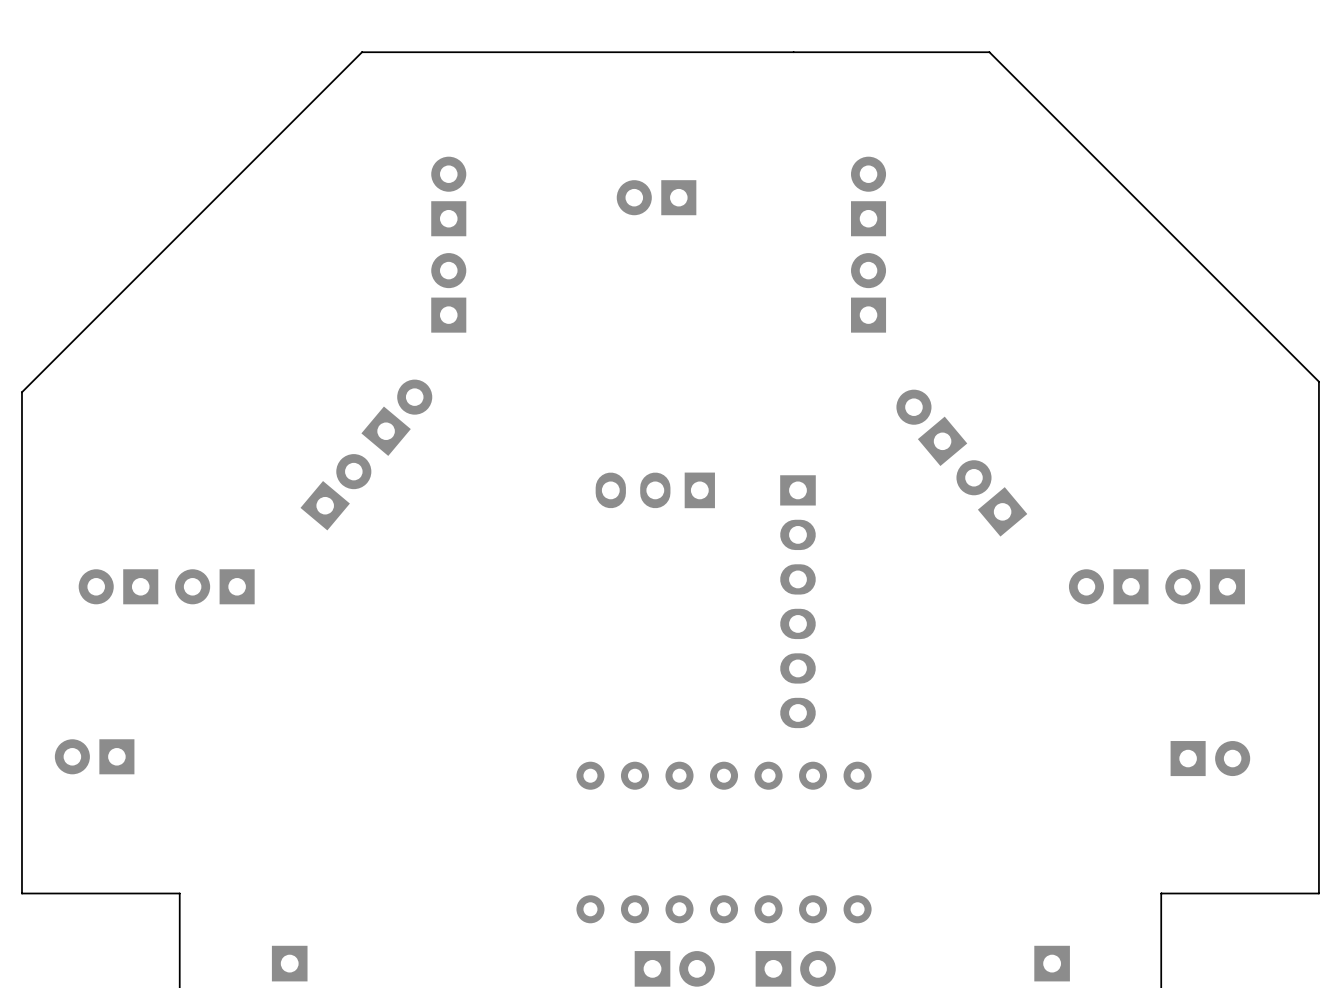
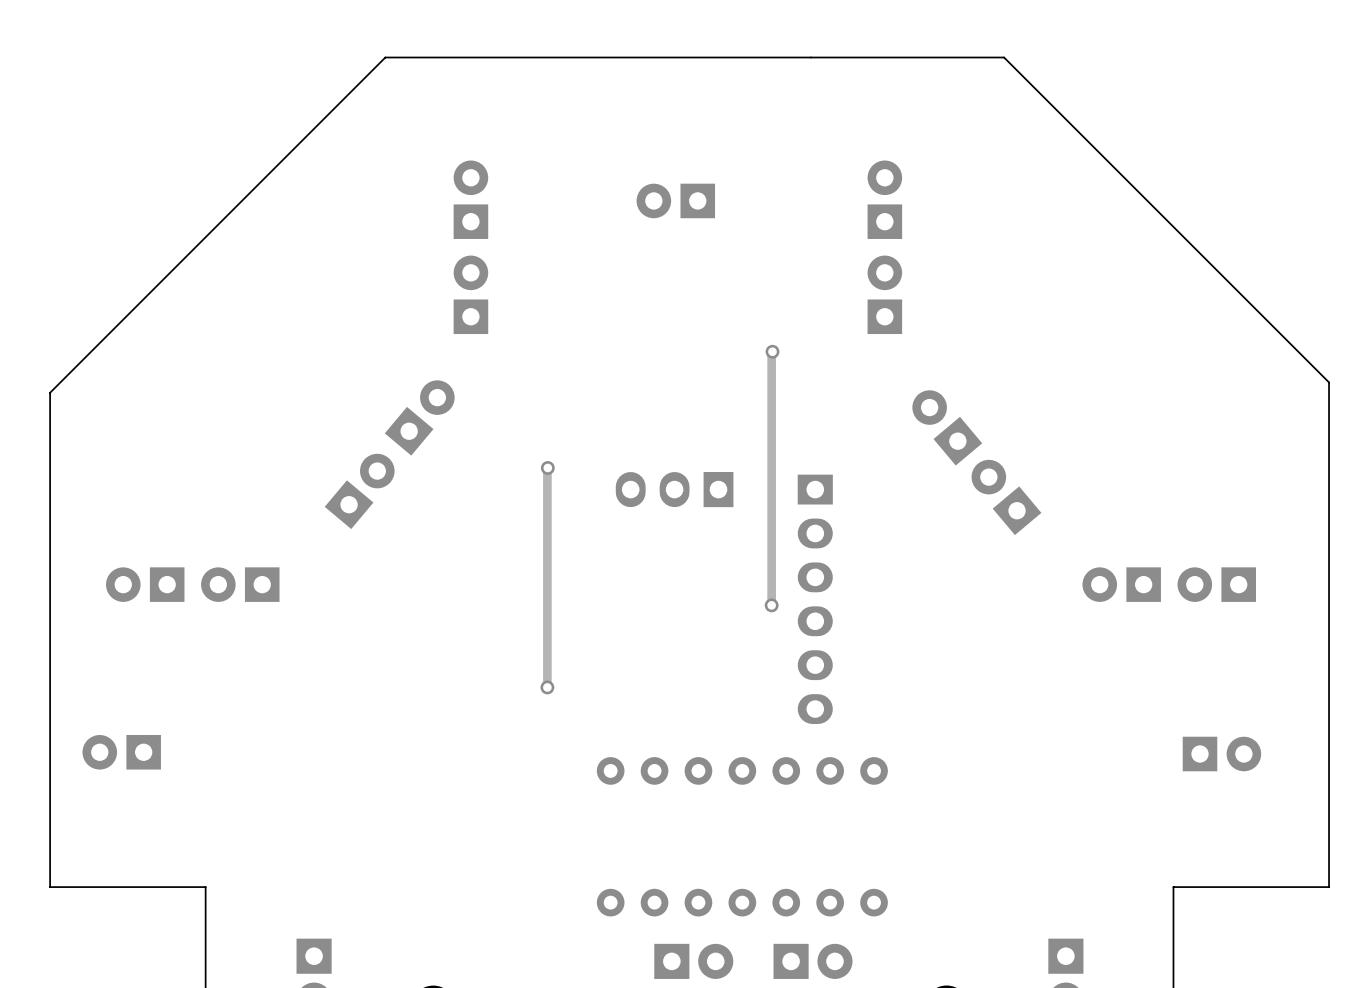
track: none -> (772, 351) (771, 605)
via: none -> (772, 351)
track: none -> (547, 467) (547, 687)
via: none -> (547, 467)
via: none -> (771, 605)
via: none -> (547, 687)

